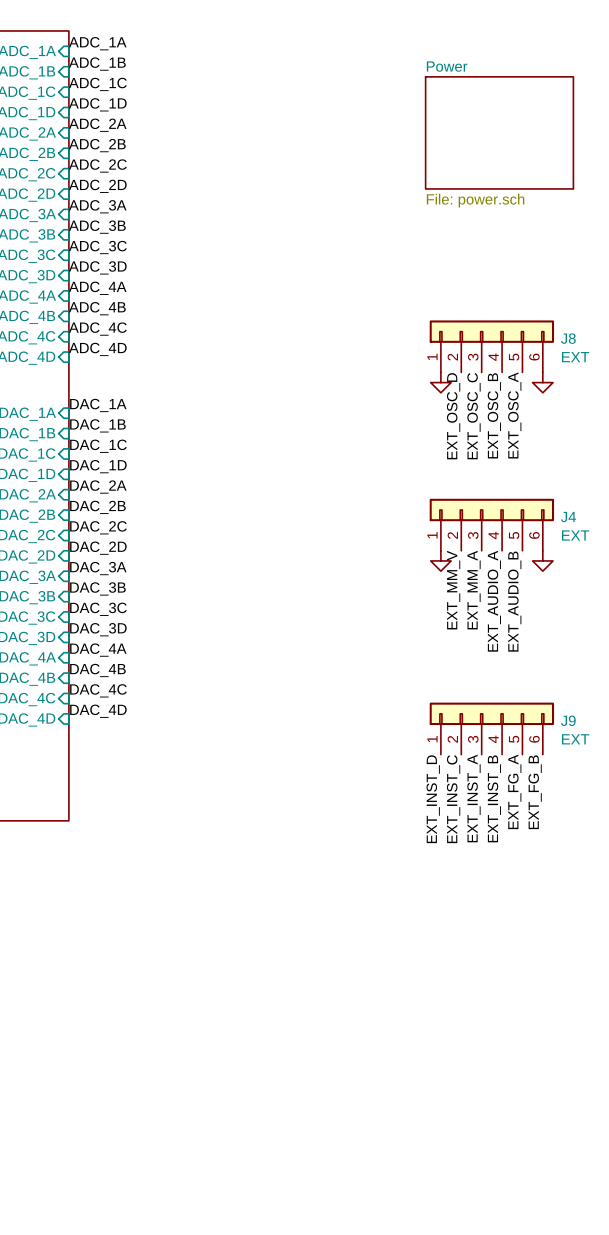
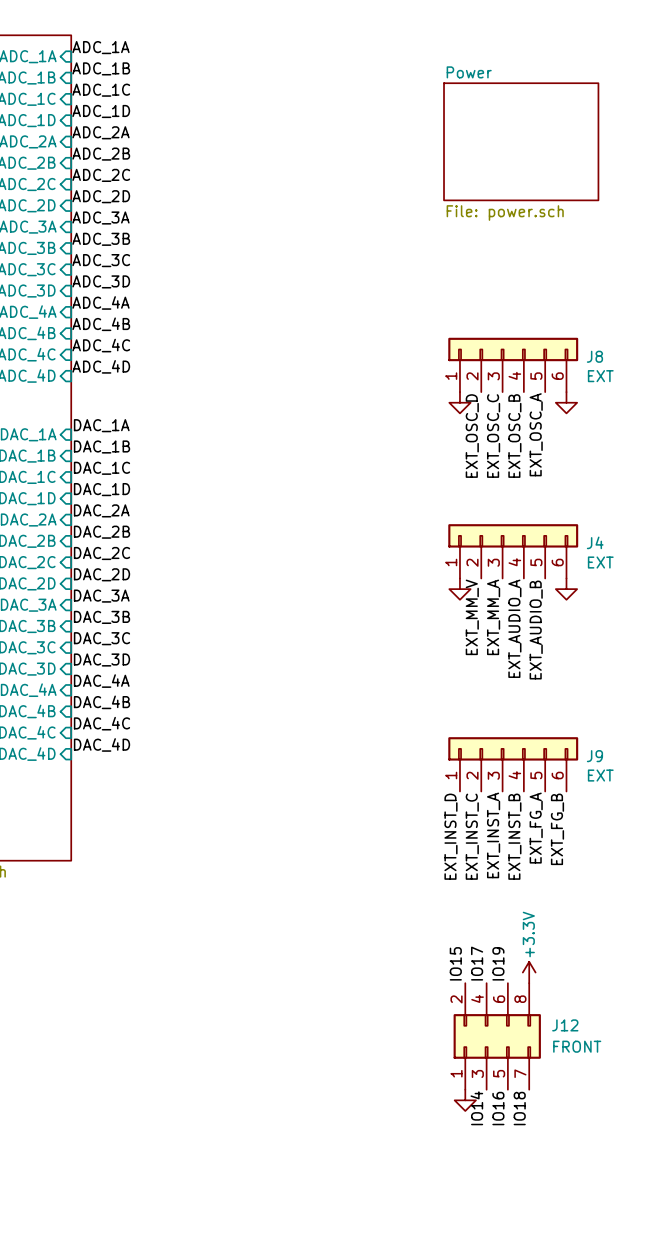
label: none -> IO15 (455, 963)
label: none -> IO17 (477, 963)
label: none -> IO19 (498, 963)
power symbol: none -> +3.3V (529, 972)
J12: none -> FRONT (497, 1036)
power symbol: none -> (465, 1100)
label: none -> IO14 (476, 1108)
label: none -> IO16 (498, 1108)
label: none -> IO18 (519, 1108)

